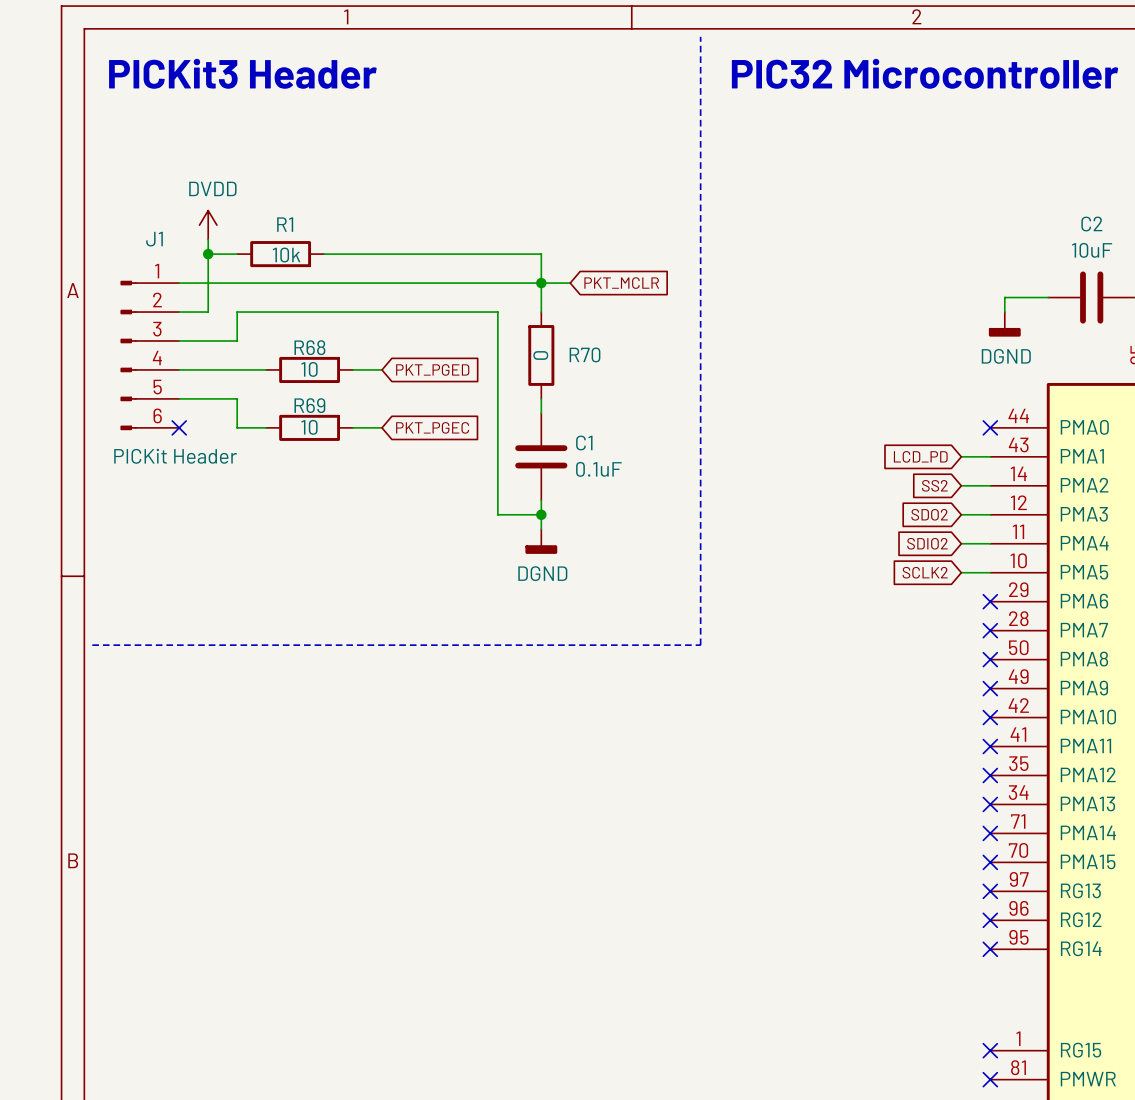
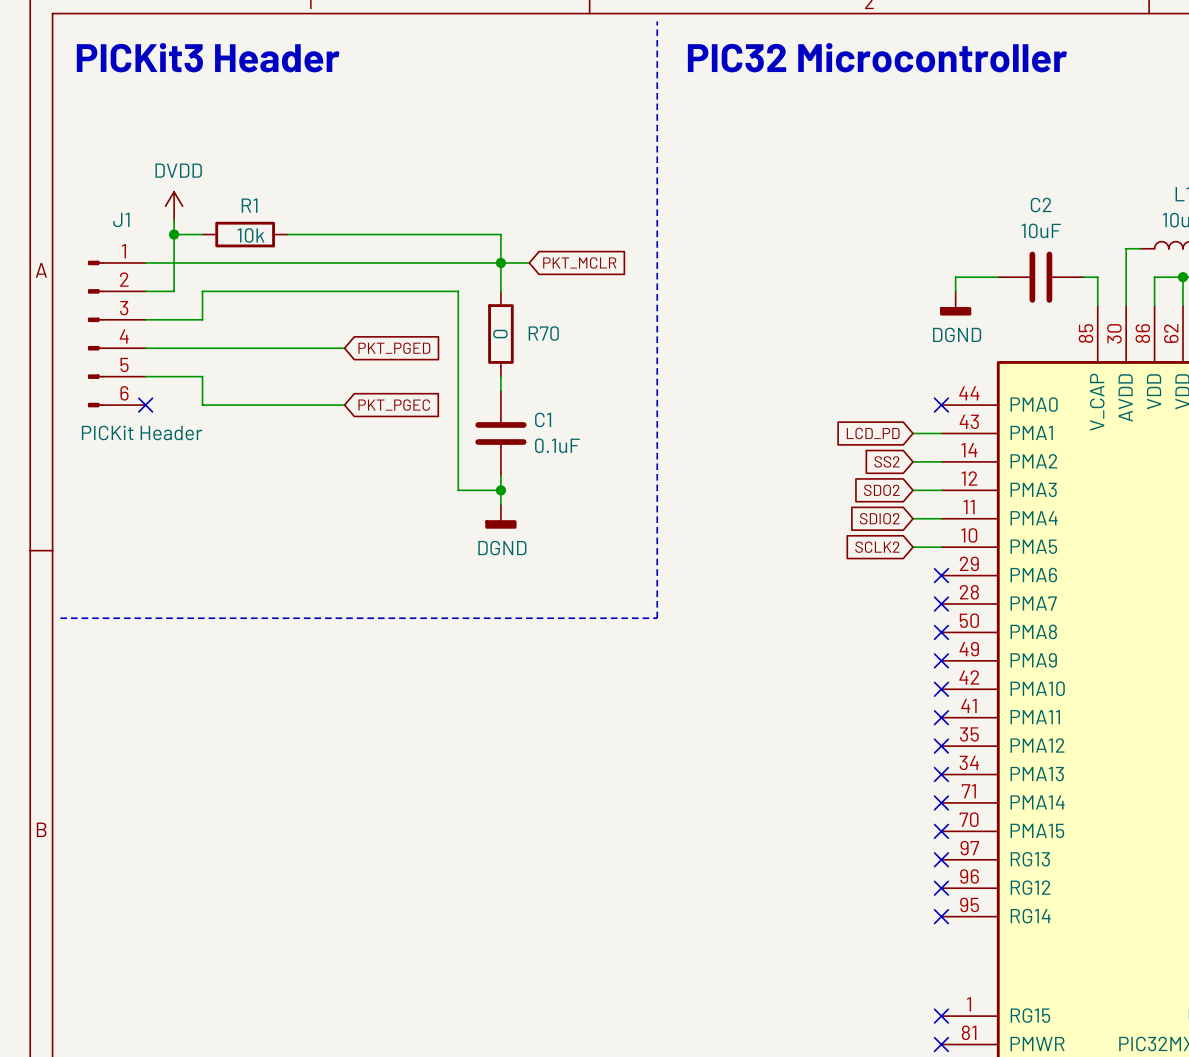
wire: none -> (230, 348) (316, 348)
R68: 10 (309, 369) -> none
wire: none -> (230, 405) (316, 405)
R69: 10 (309, 427) -> none

